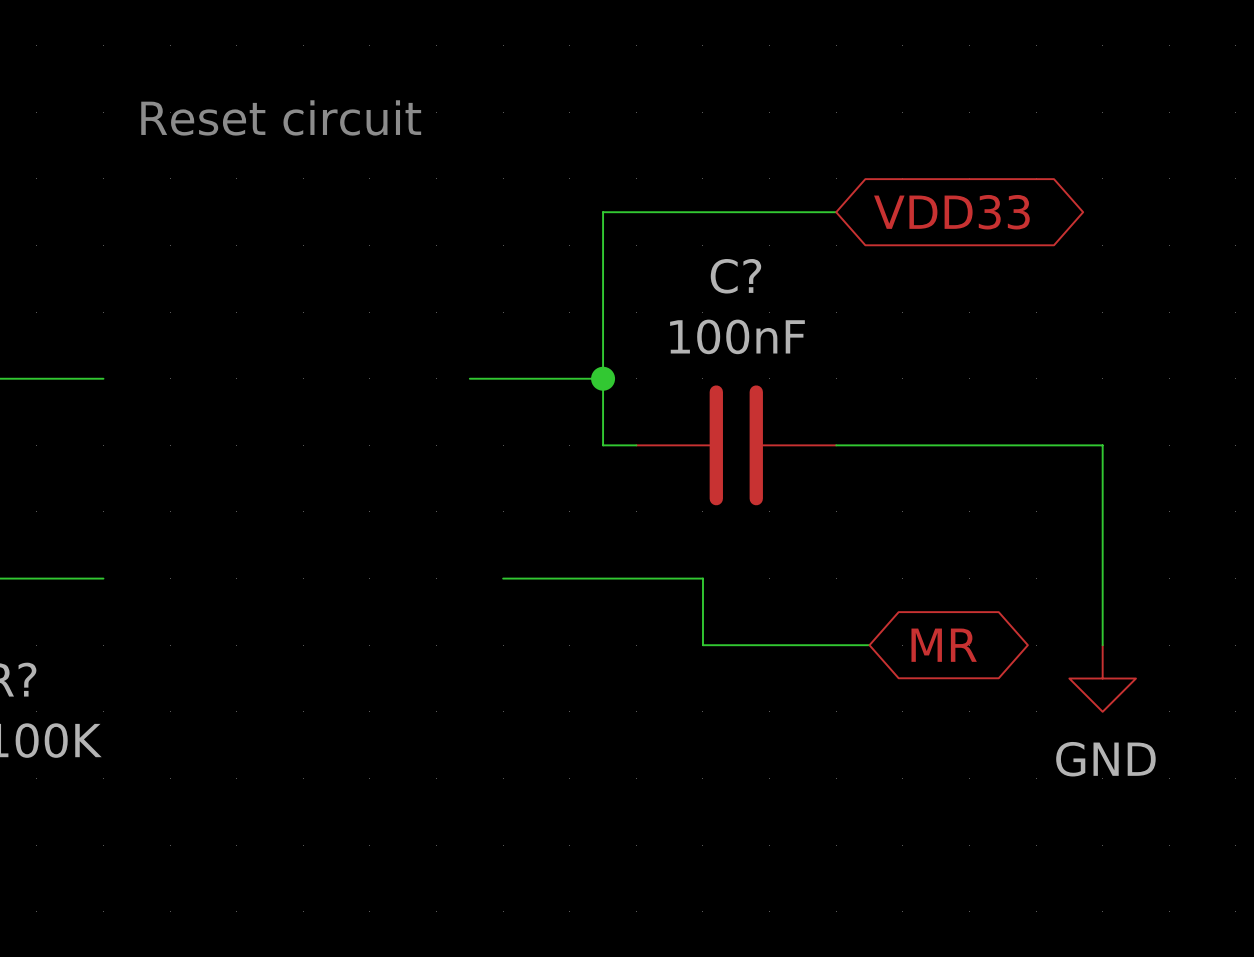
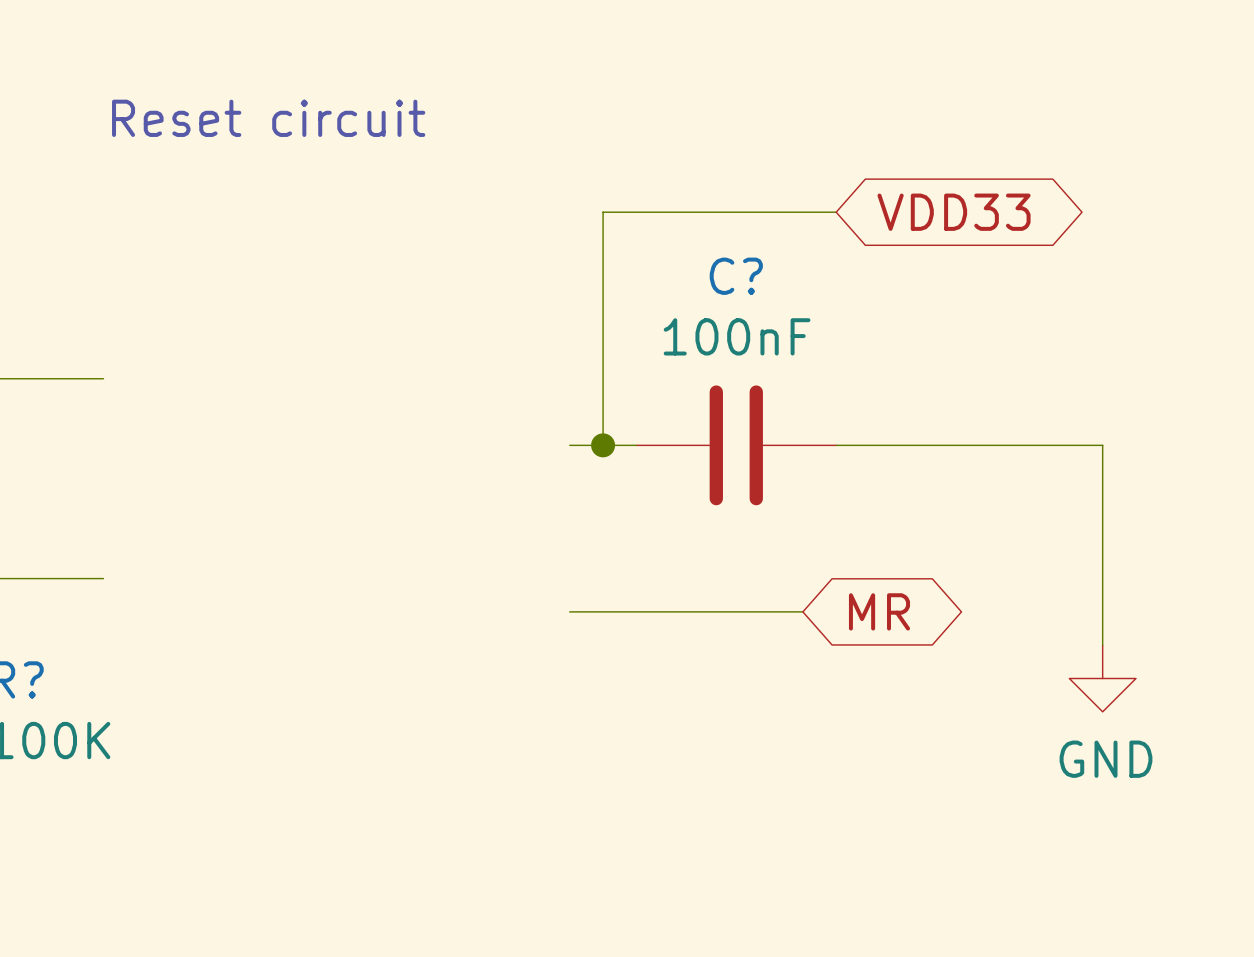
text position: Reset circuit (281, 117) -> Reset circuit (268, 118)
wire: (469, 378) (603, 378) -> none
junction position: (603, 378) -> (603, 445)
wire: none -> (569, 445) (603, 445)
wire: (503, 578) (702, 578) (702, 645) (869, 645) -> none
wire: none -> (569, 611) (802, 611)
global label position: MR (944, 645) -> MR (879, 611)

